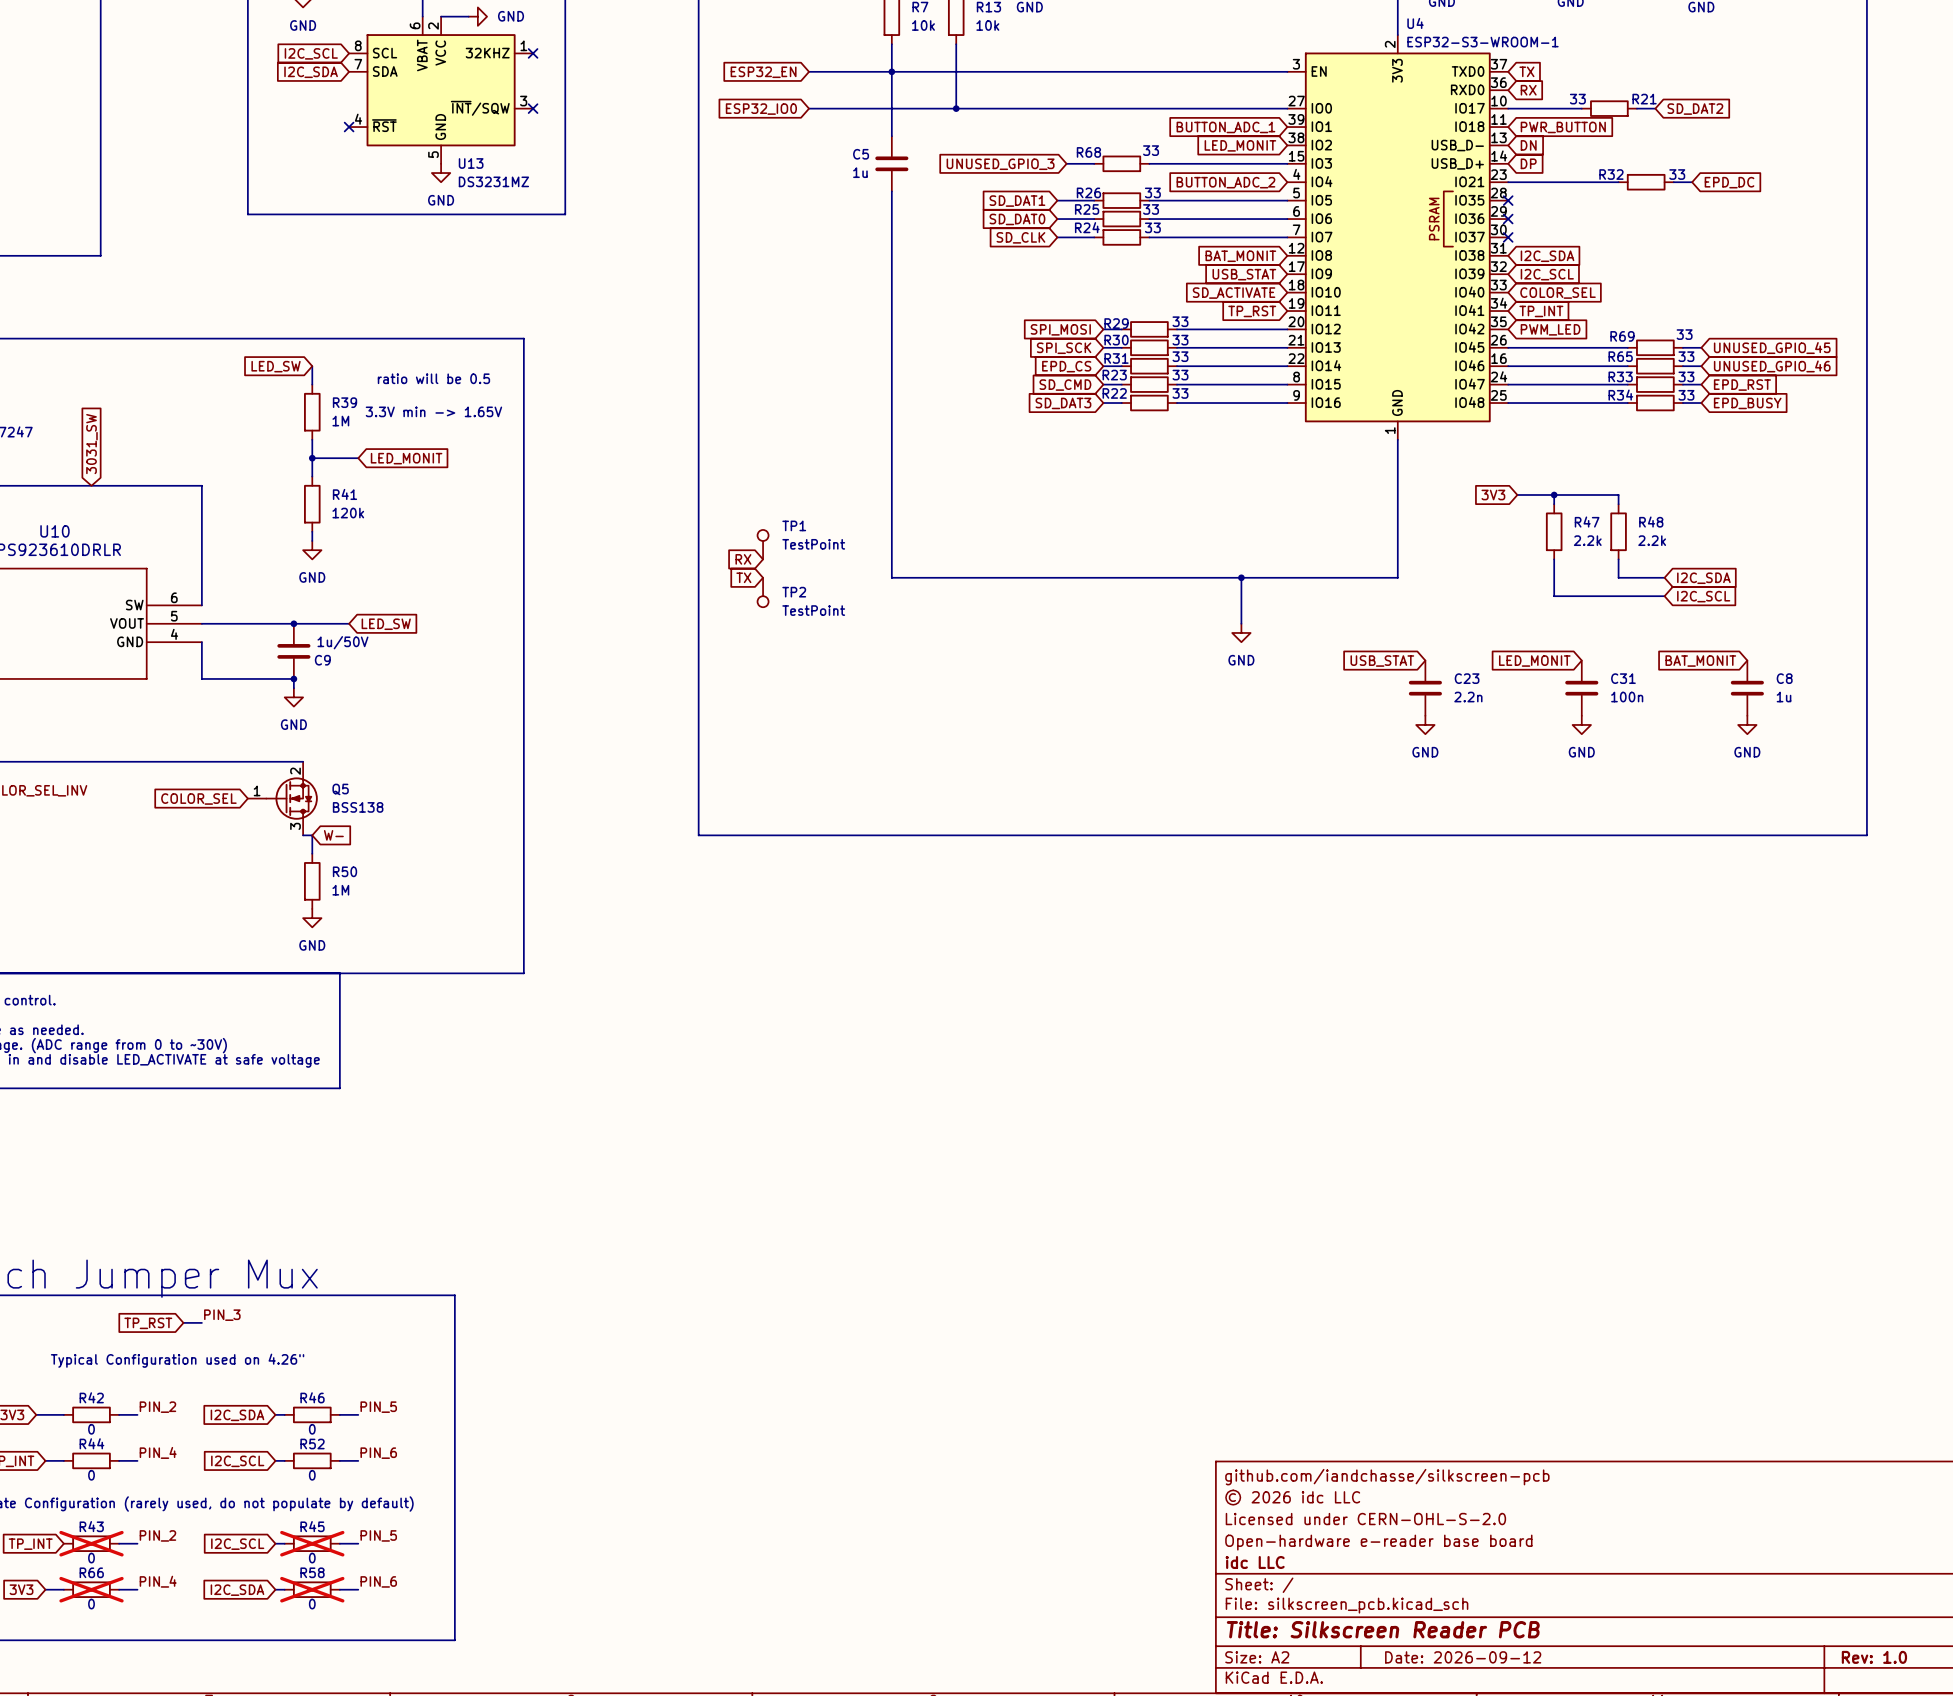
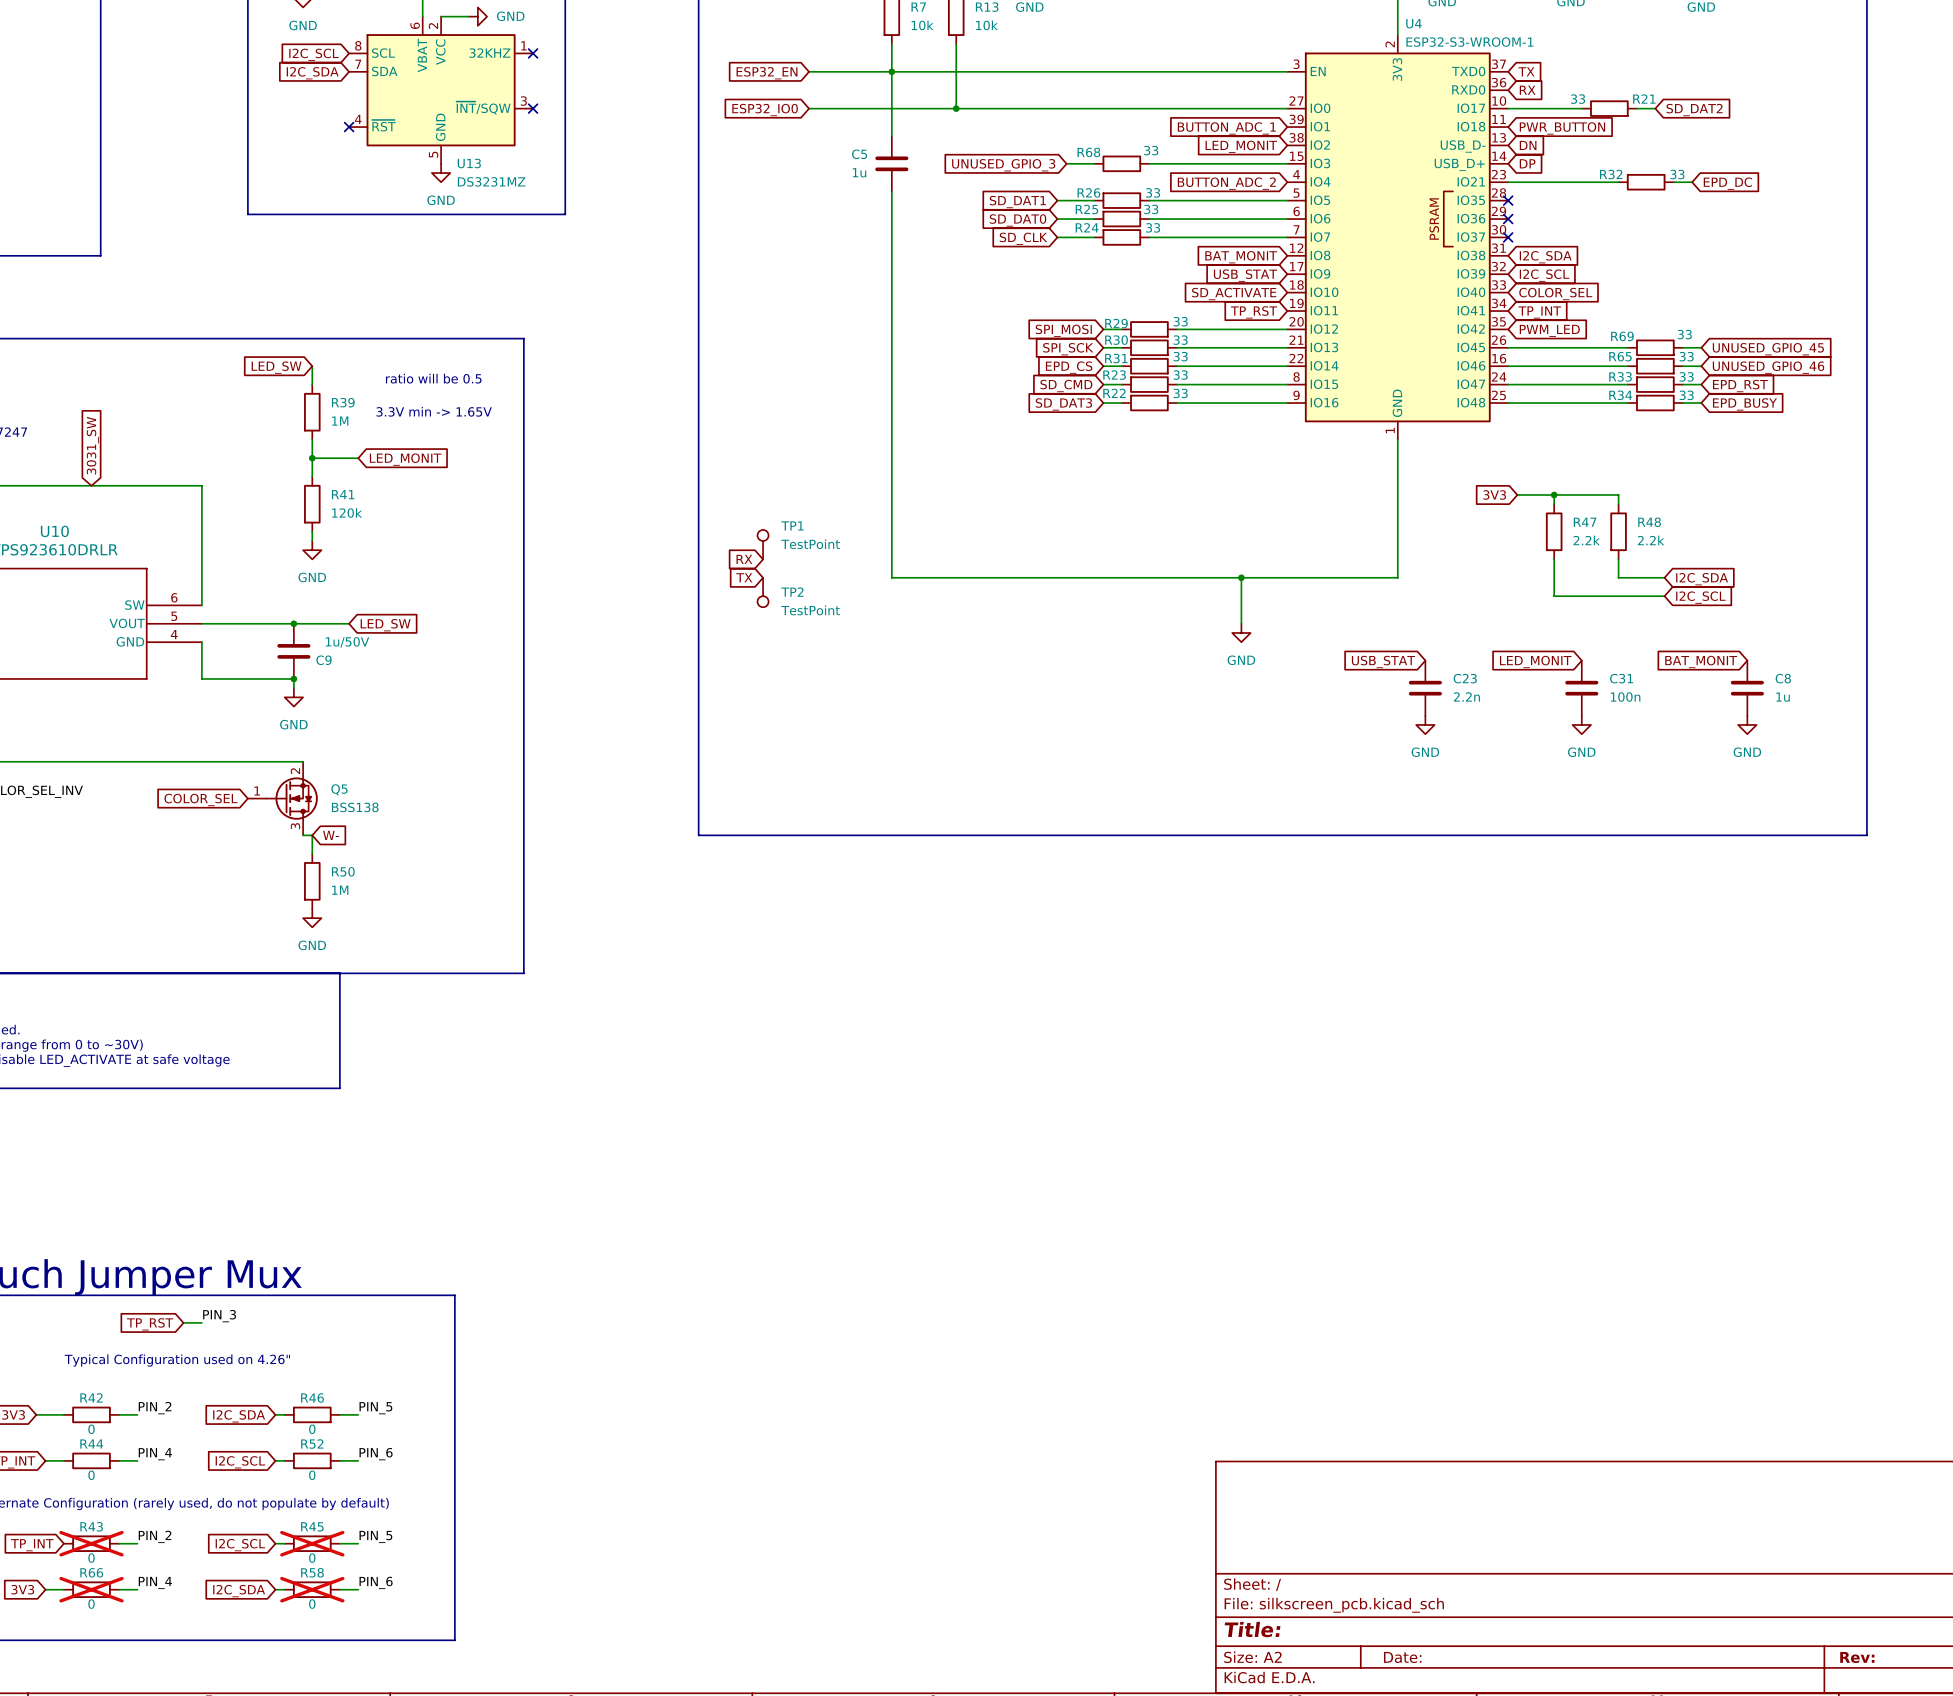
title block: github.com/iandchasse/silkscreen-pcb (1387, 1477) -> none
title block: © 2026 idc LLC (1292, 1497) -> none
title block: Licensed under CERN-OHL-S-2.0 (1365, 1519) -> none
title block: Open-hardware e-reader base board (1378, 1542) -> none
title block: idc LLC (1255, 1562) -> none
title block: Title: Silkscreen Reader PCB (1383, 1629) -> Title: (1252, 1629)
title block: Date: 2026-09-12 (1463, 1657) -> Date: (1402, 1657)
title block: Rev: 1.0 (1874, 1657) -> Rev: (1857, 1657)

